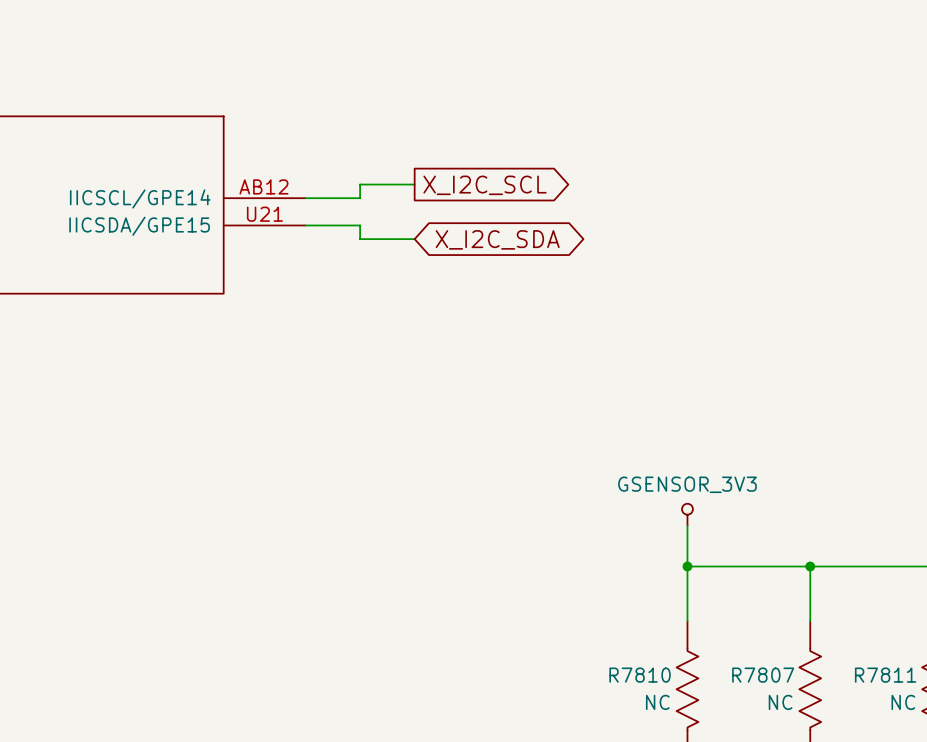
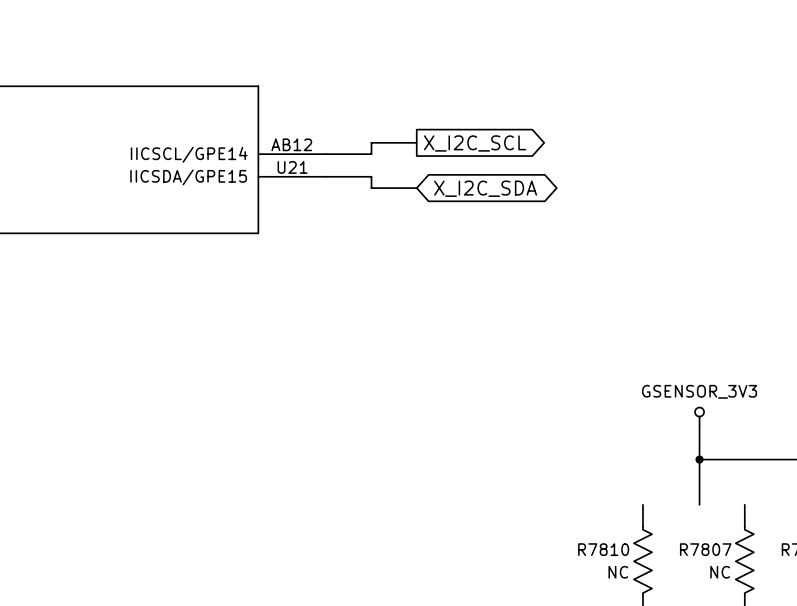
power symbol position: GSENSOR_3V3 (687, 514) -> GSENSOR_3V3 (699, 416)
wire: (687, 525) (687, 621) -> (699, 425) (699, 504)
wire: (687, 566) (755, 566) -> none
junction: (687, 566) -> none
junction: none -> (699, 459)
wire: (810, 566) (810, 621) -> none
junction: (810, 566) -> none

